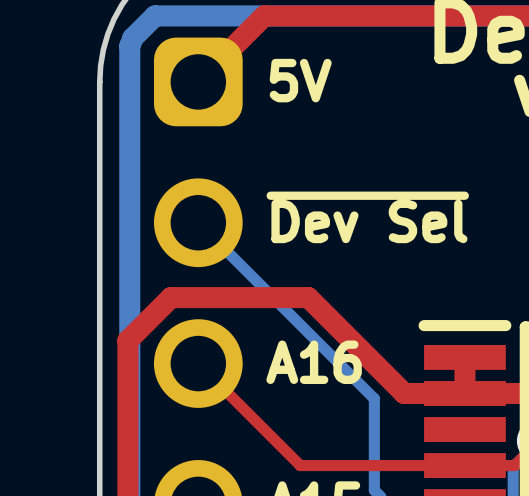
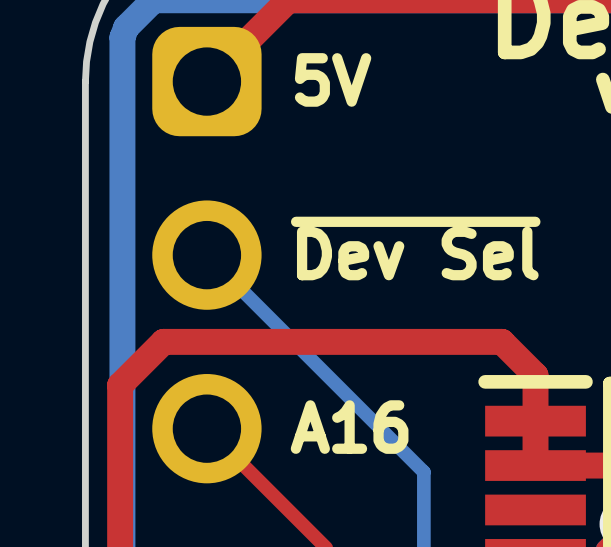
top track: (127, 340) (171, 297) (308, 297) (404, 393) (464, 393) -> (120, 400) (120, 385) (163, 341) (501, 341) (535, 375) (535, 421)

